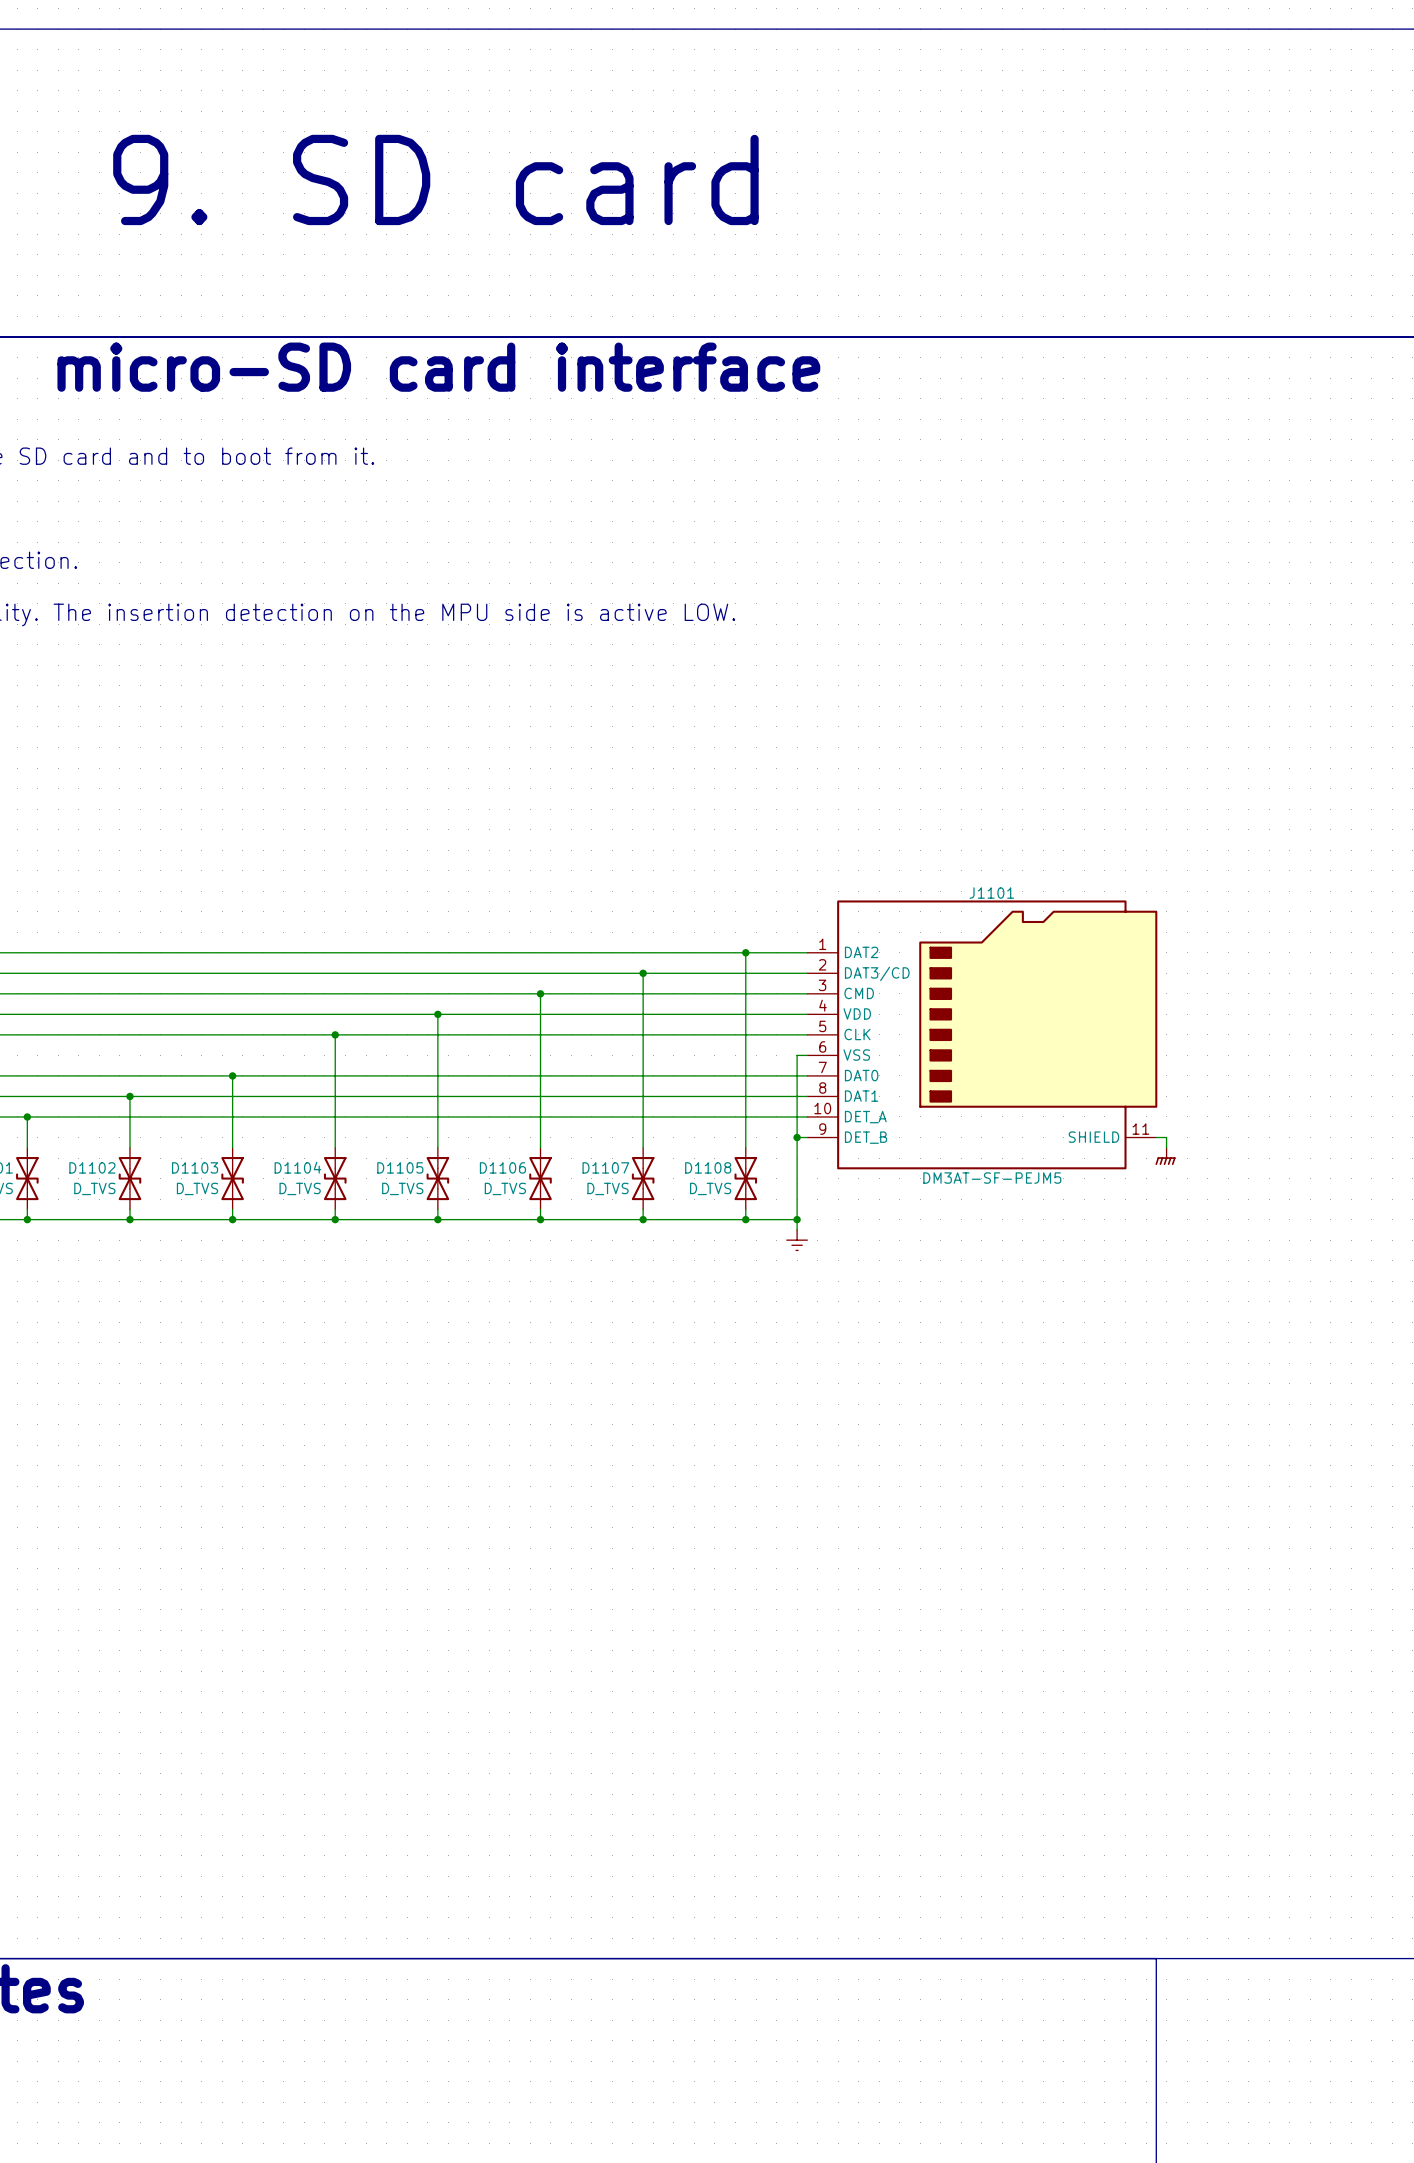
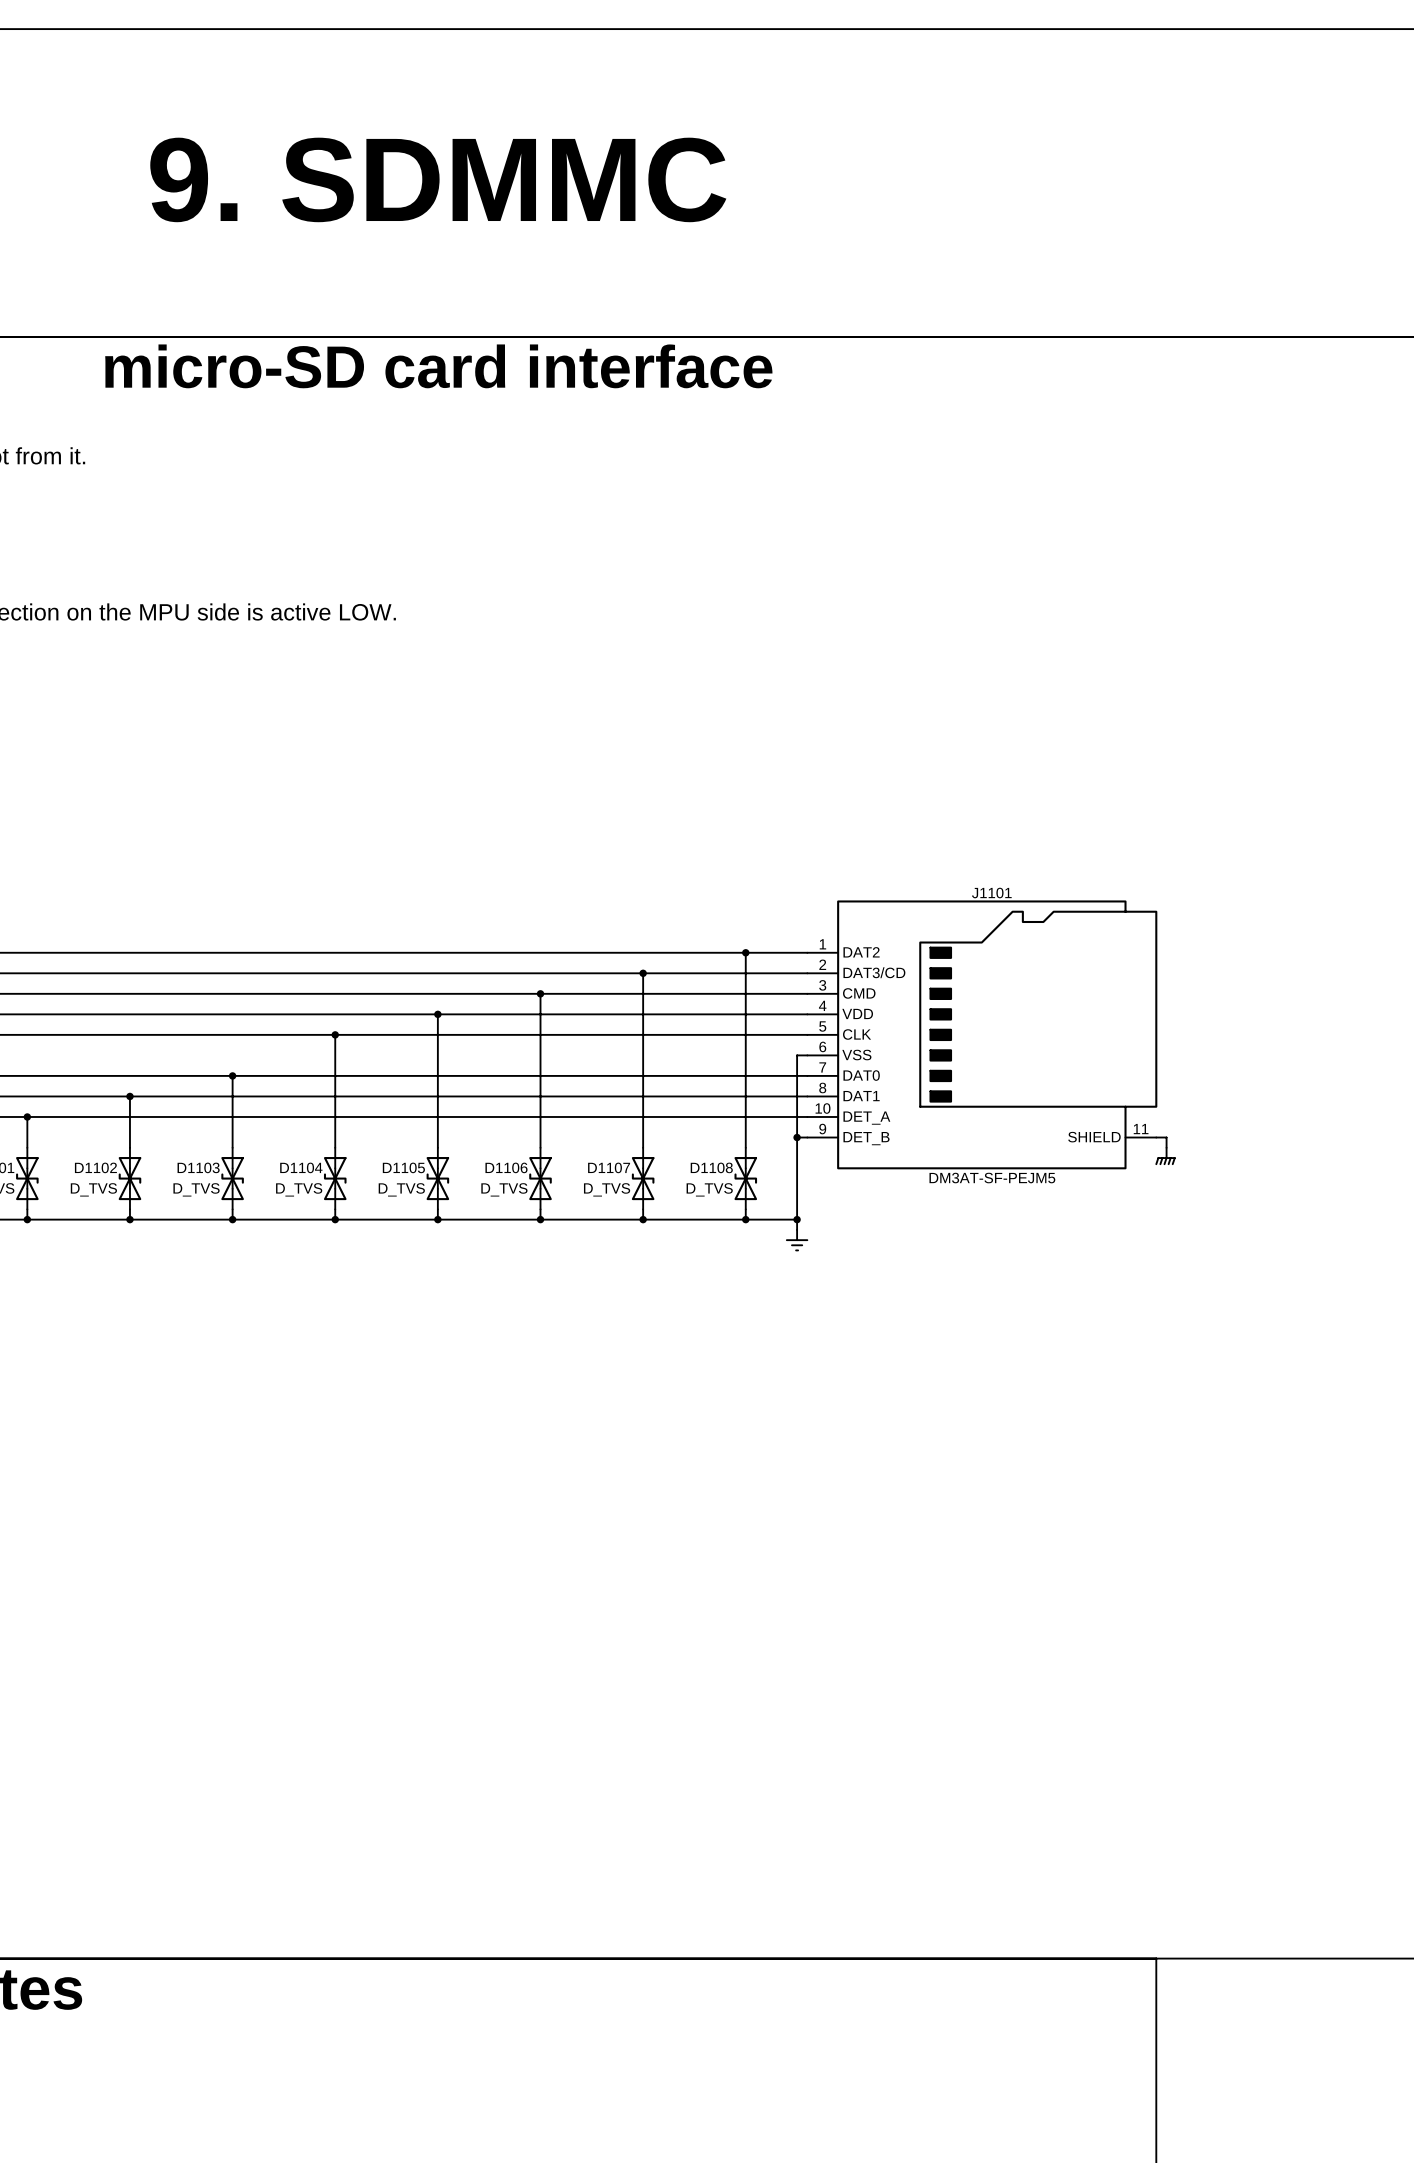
text: 9. SD card (435, 179) -> 9. SDMMC (438, 179)

